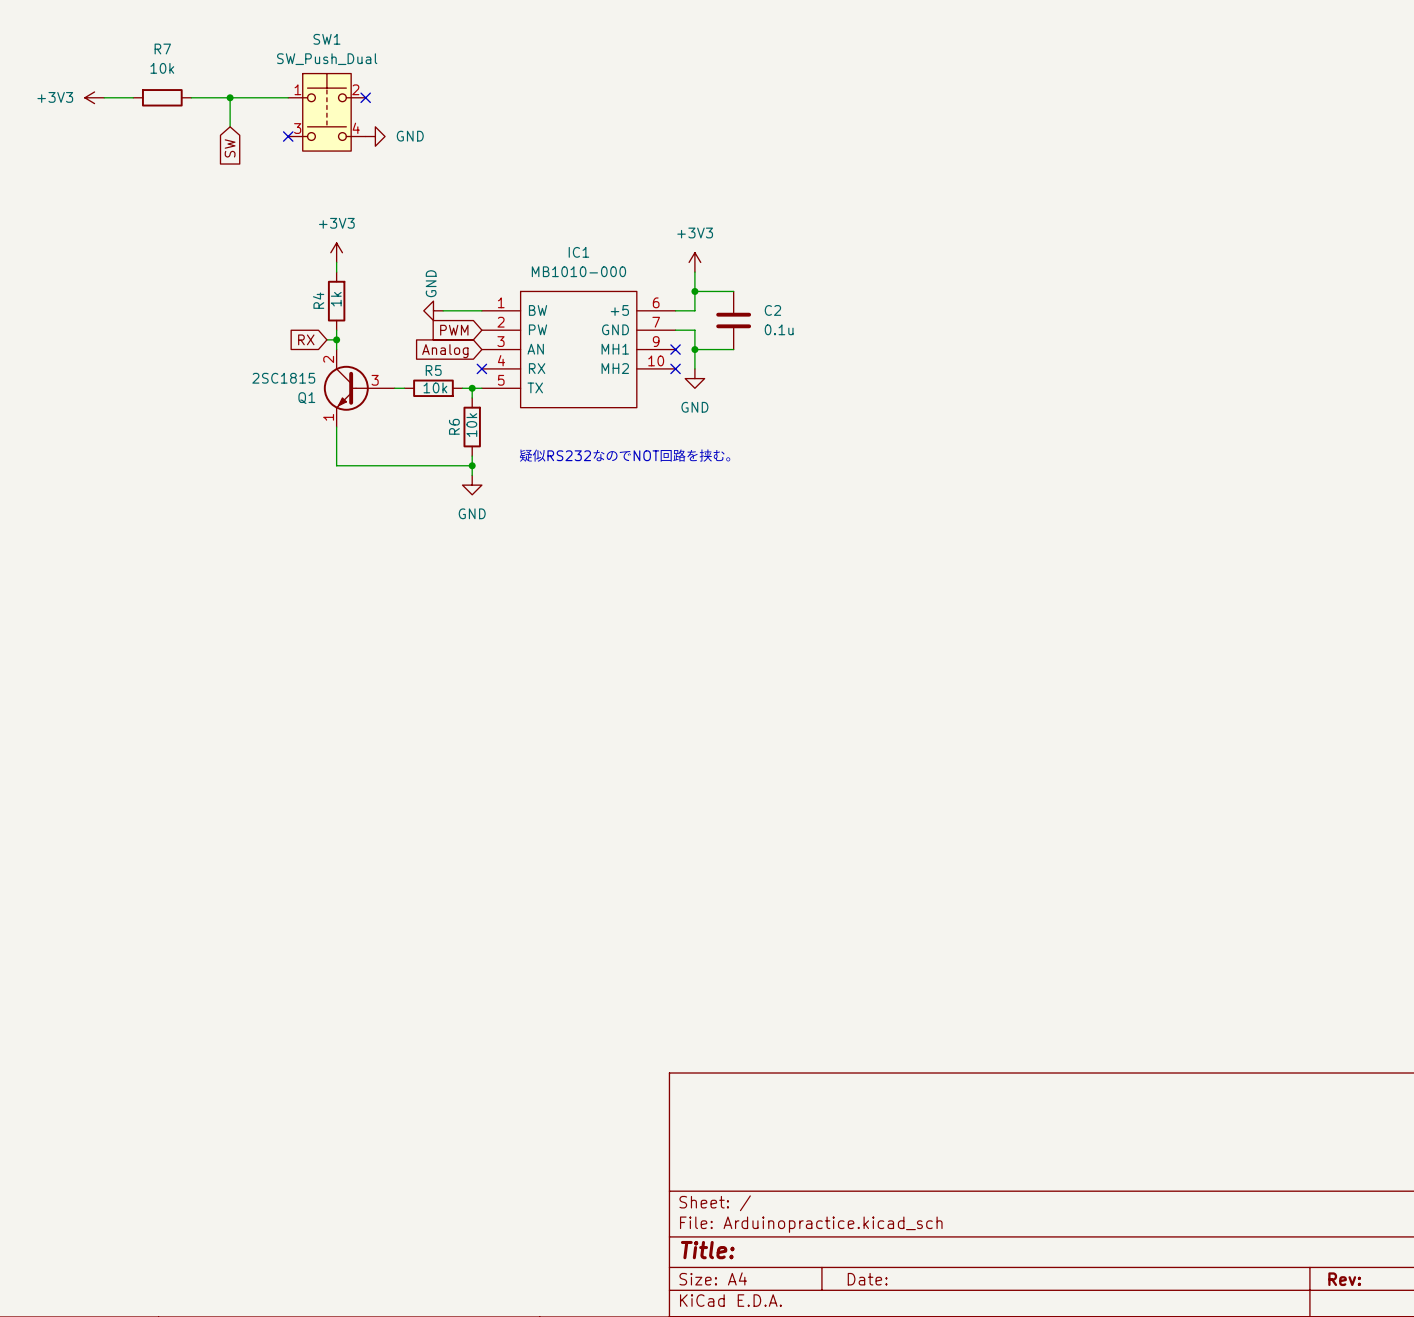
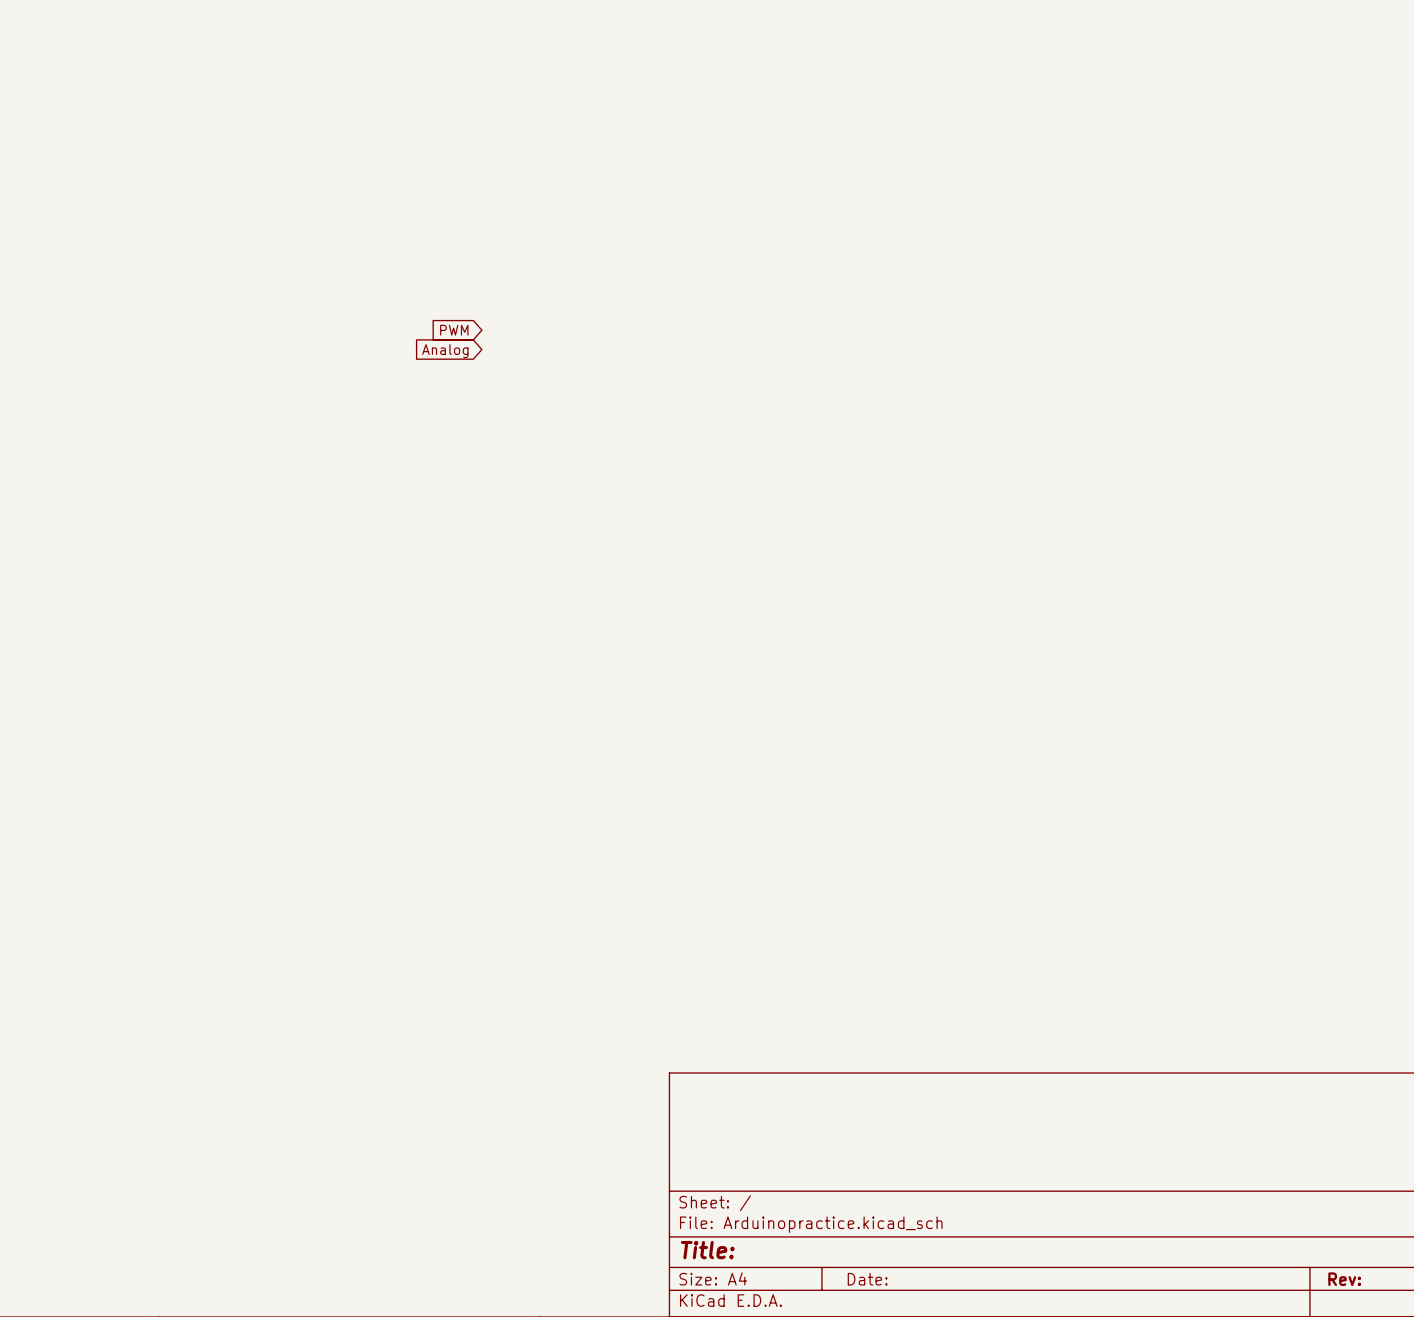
power symbol: +3V3 (94, 97) -> none
wire: (104, 97) (133, 97) -> none
R7: 10k (162, 97) -> none
wire: (191, 97) (288, 97) -> none
wire: (230, 97) (230, 126) -> none
junction: (230, 97) -> none
no-connect mark: (365, 97) -> none
SW1: SW_Push_Dual (326, 112) -> none
no-connect mark: (288, 136) -> none
power symbol: GND (375, 136) -> none
global label: SW (230, 148) -> none
power symbol: +3V3 (336, 252) -> none
wire: (336, 262) (336, 272) -> none
power symbol: +3V3 (694, 262) -> none
wire: (694, 272) (694, 310) (675, 310) -> none
wire: (694, 291) (733, 291) -> none
junction: (694, 291) -> none
R4: 1k (336, 301) -> none
power symbol: GND (433, 310) -> none
wire: (443, 310) (481, 310) -> none
C2: 0.1u (733, 320) -> none
wire: (336, 330) (336, 349) -> none
wire: (675, 330) (694, 330) (694, 368) -> none
global label: RX (306, 339) -> none
wire: (326, 339) (336, 339) -> none
junction: (336, 339) -> none
IC1: MB1010-000 (578, 349) -> none
no-connect mark: (675, 349) -> none
wire: (694, 349) (733, 349) -> none
junction: (694, 349) -> none
no-connect mark: (481, 368) -> none
no-connect mark: (675, 368) -> none
power symbol: GND (694, 378) -> none
Q1: 2SC1815 (359, 388) -> none
wire: (394, 388) (404, 388) -> none
R5: 10k (433, 388) -> none
wire: (462, 388) (481, 388) -> none
wire: (472, 388) (472, 397) -> none
junction: (472, 388) -> none
wire: (336, 427) (336, 465) (472, 465) -> none
R6: 10k (472, 427) -> none
text: 疑似RS232なのでNOT回路を挟む。 (625, 455) -> none
wire: (472, 456) (472, 475) -> none
junction: (472, 465) -> none
power symbol: GND (472, 485) -> none

